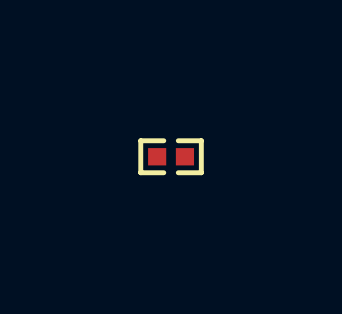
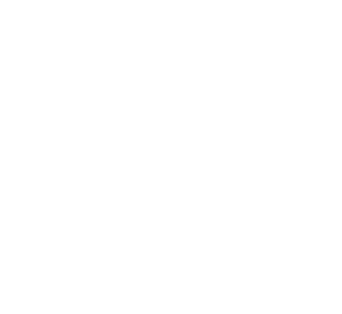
part: (171, 156) -> none

